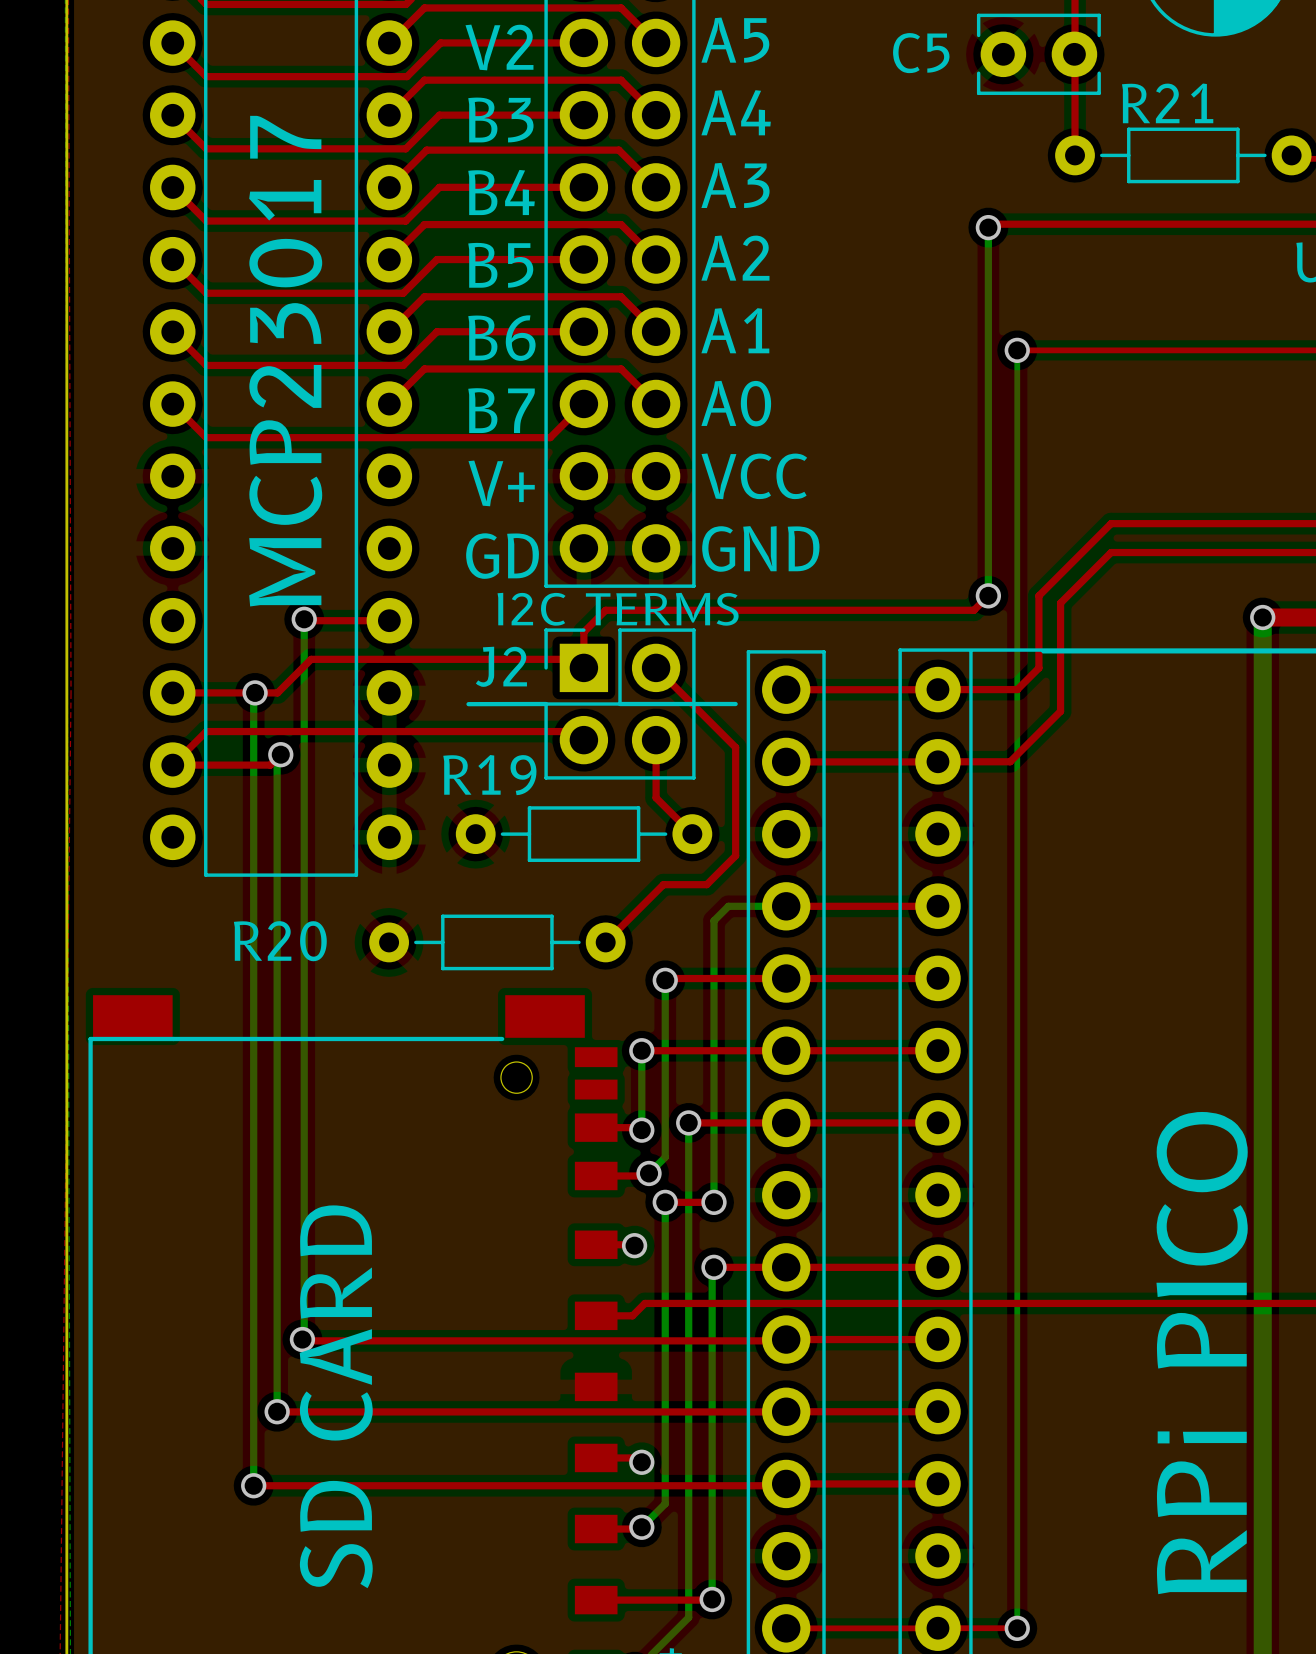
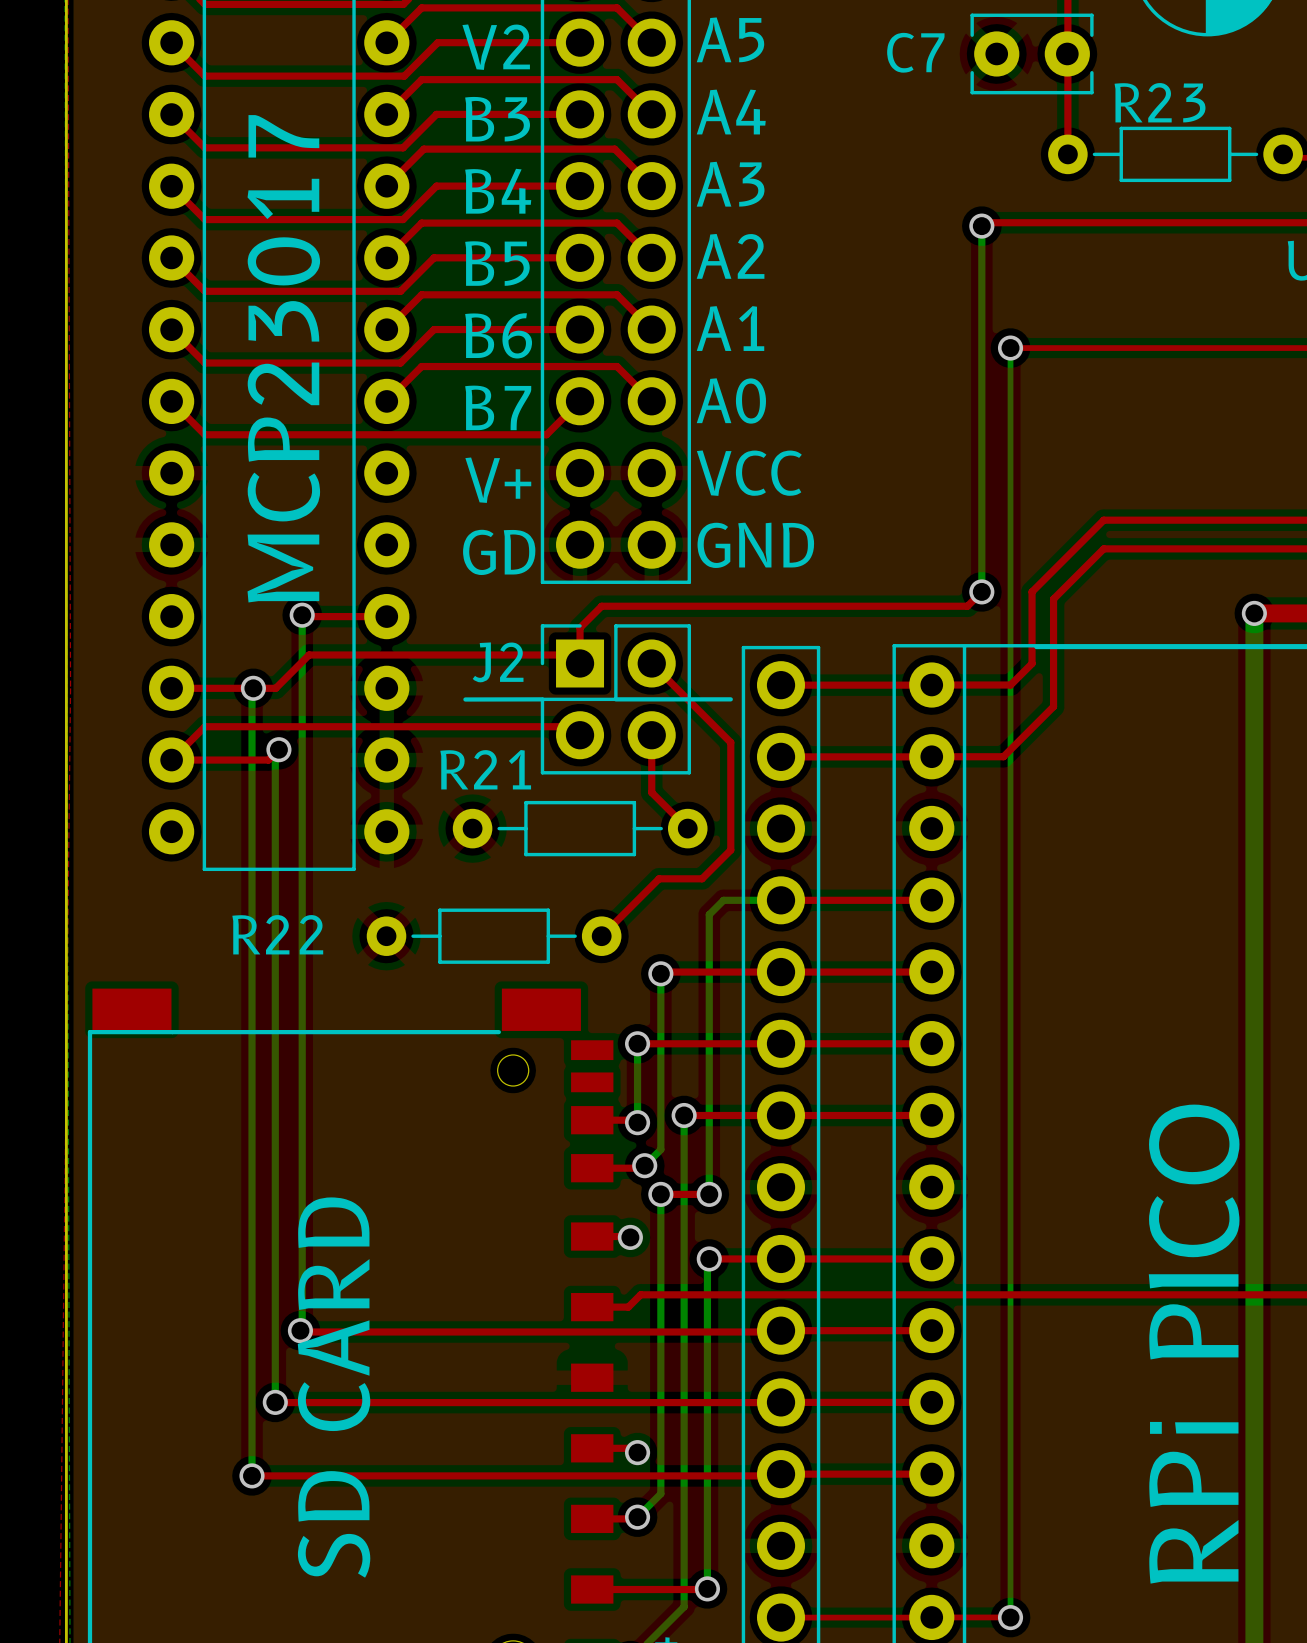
C5 name: C5 (921, 53) -> C7 (915, 52)
R21 name: R21 (1167, 103) -> R23 (1160, 102)
text: I2C TERMS (618, 609) -> none
R19 name: R19 (489, 775) -> R21 (485, 769)
R20 name: R20 (280, 941) -> R22 (277, 934)

